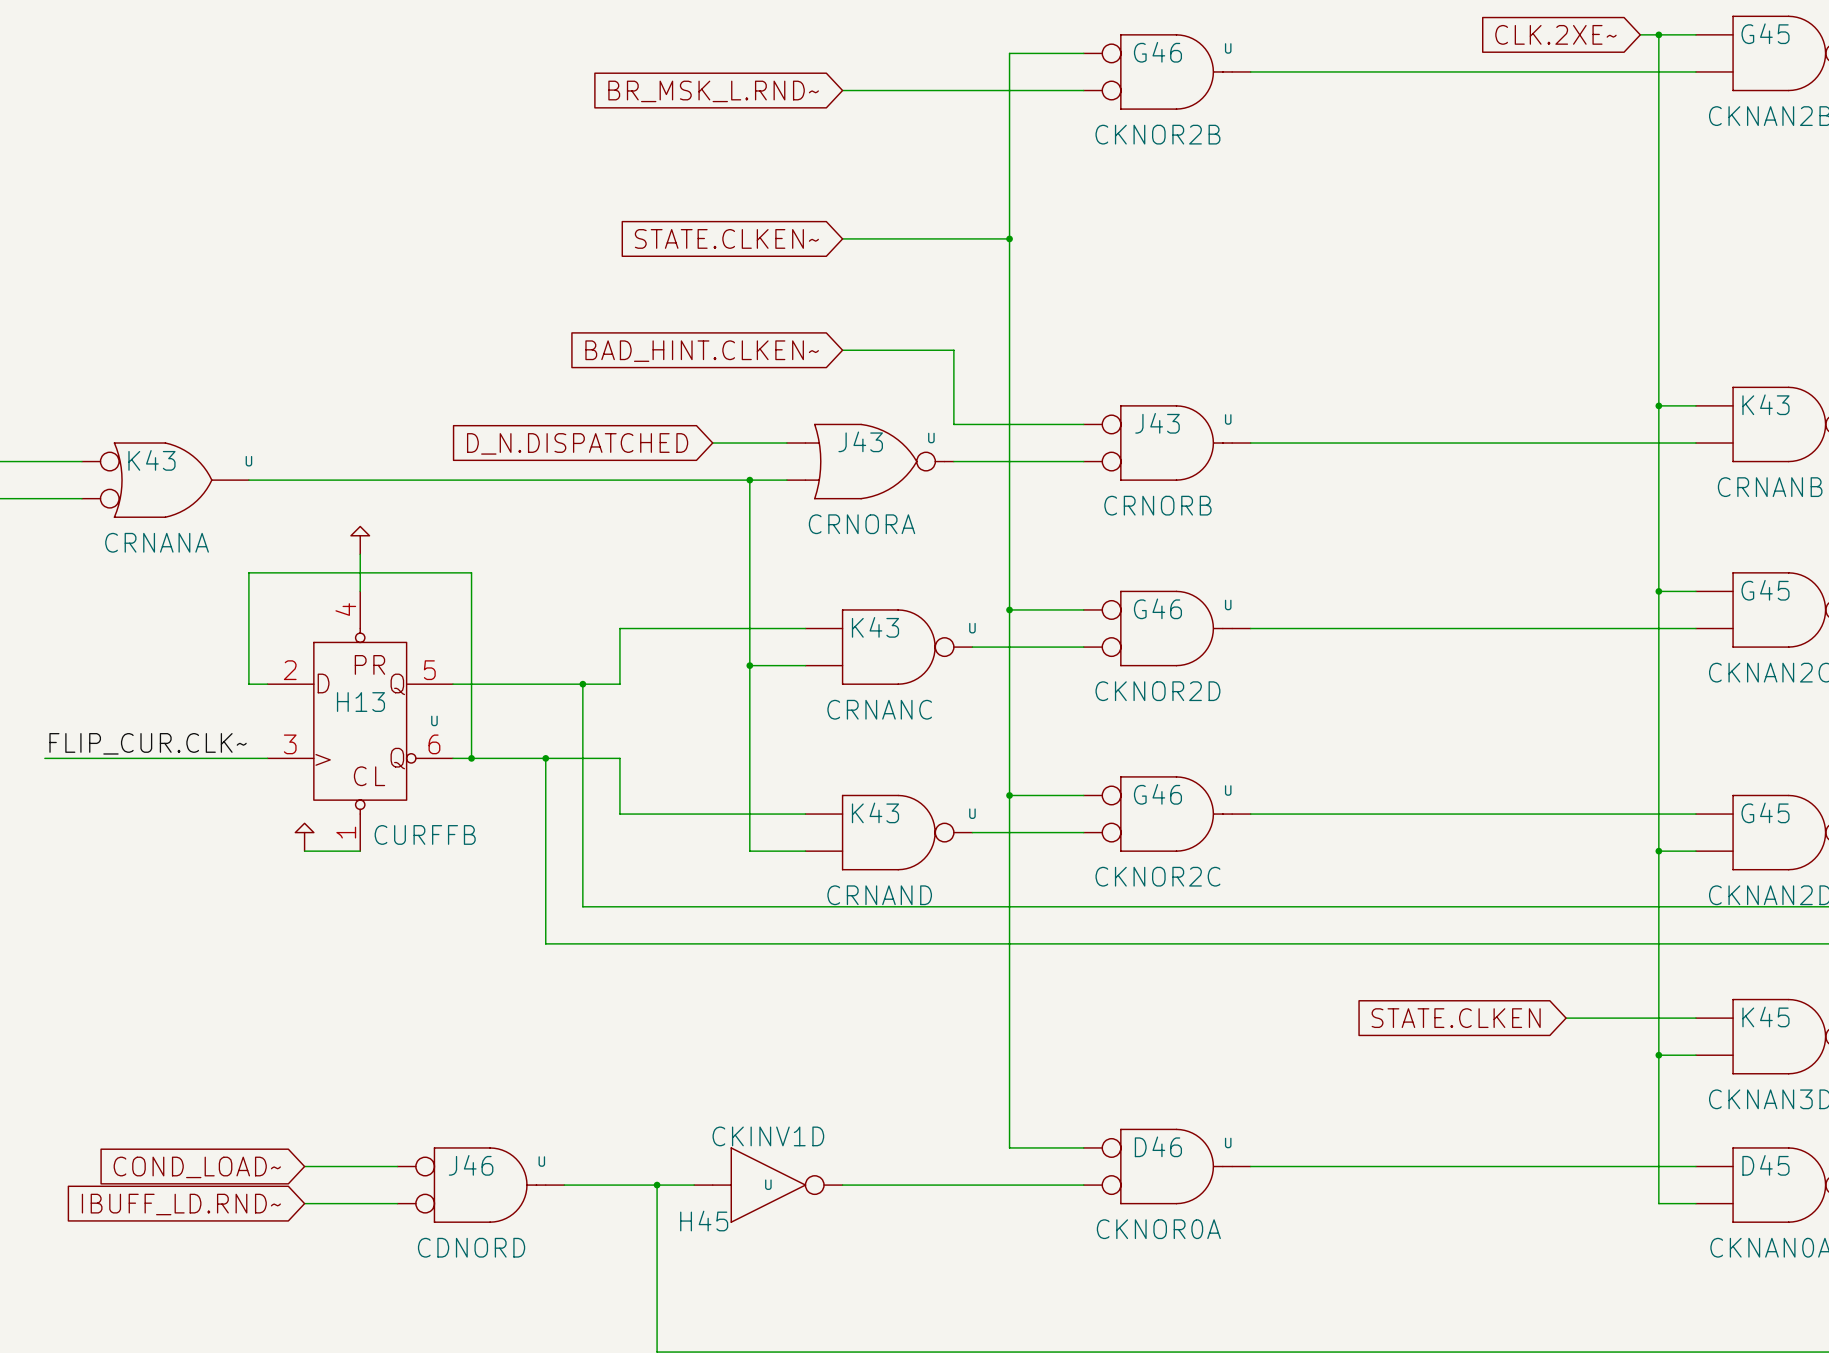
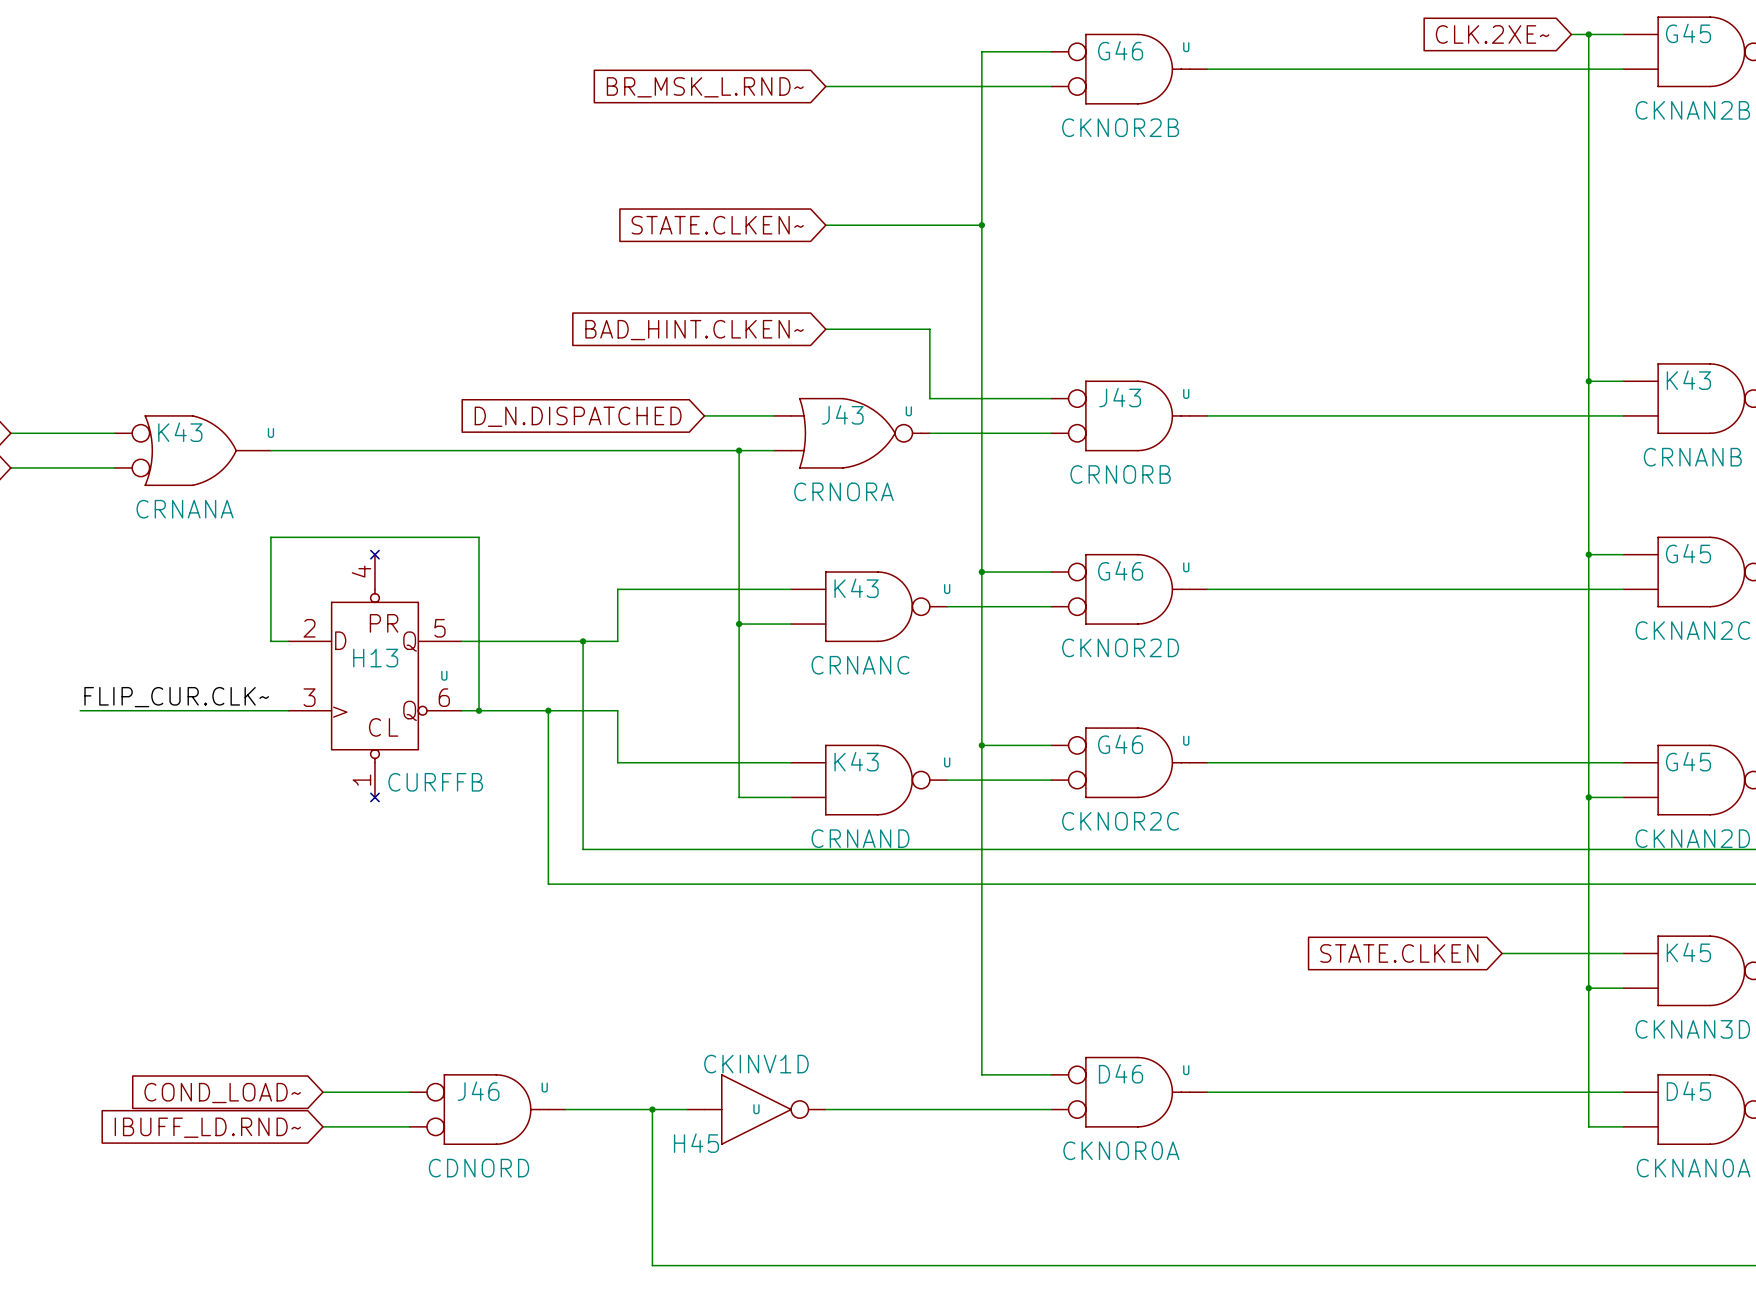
power symbol: (360, 540) -> none
wire: (360, 554) (360, 591) -> none
no-connect mark: none -> (374, 554)
power symbol: (304, 836) -> none
wire: (304, 851) (360, 851) -> none
no-connect mark: none -> (374, 797)

